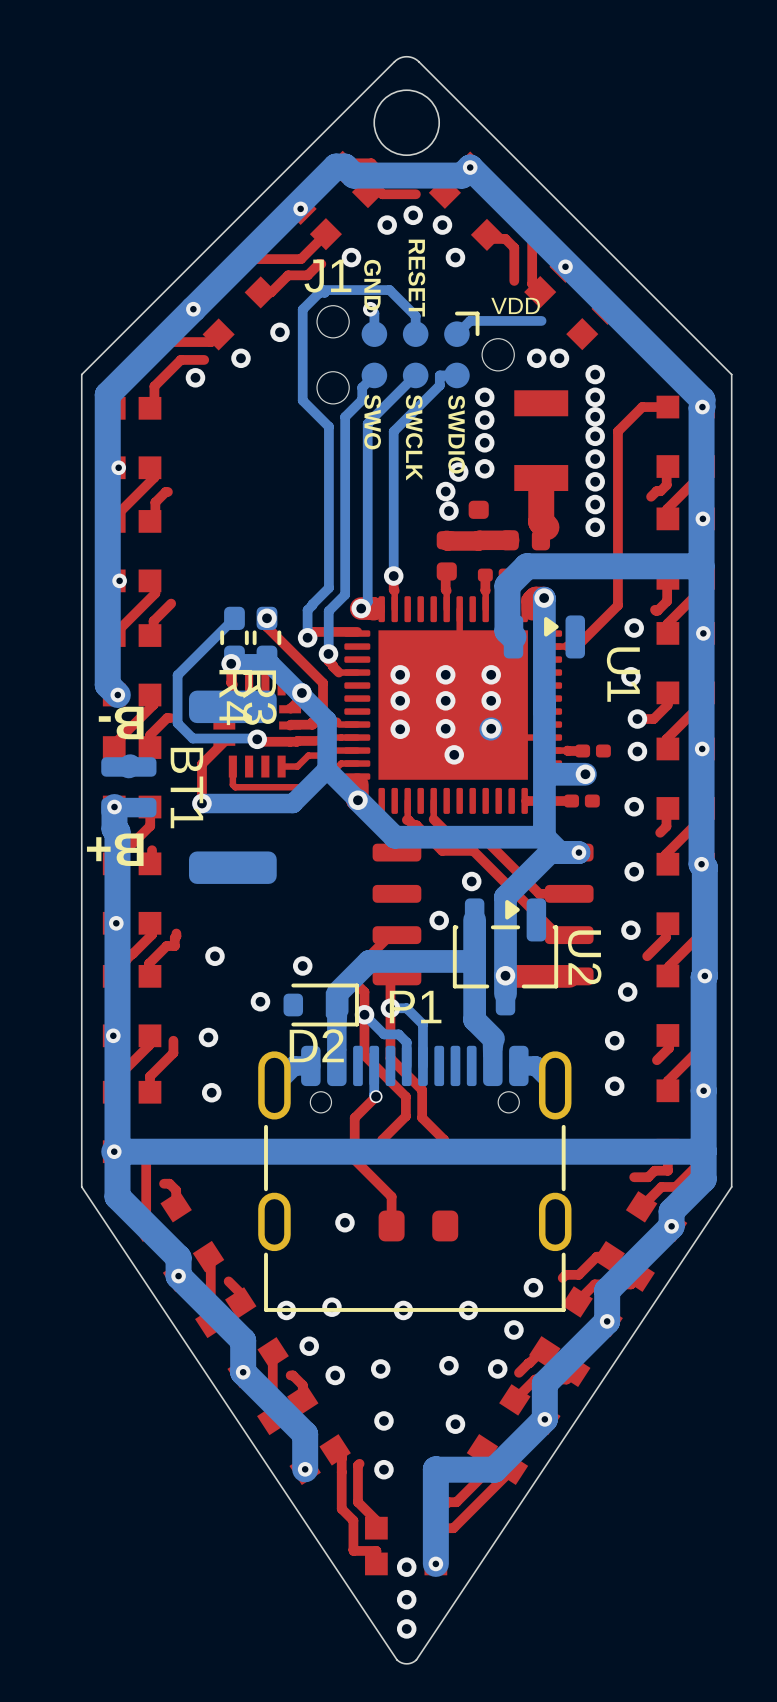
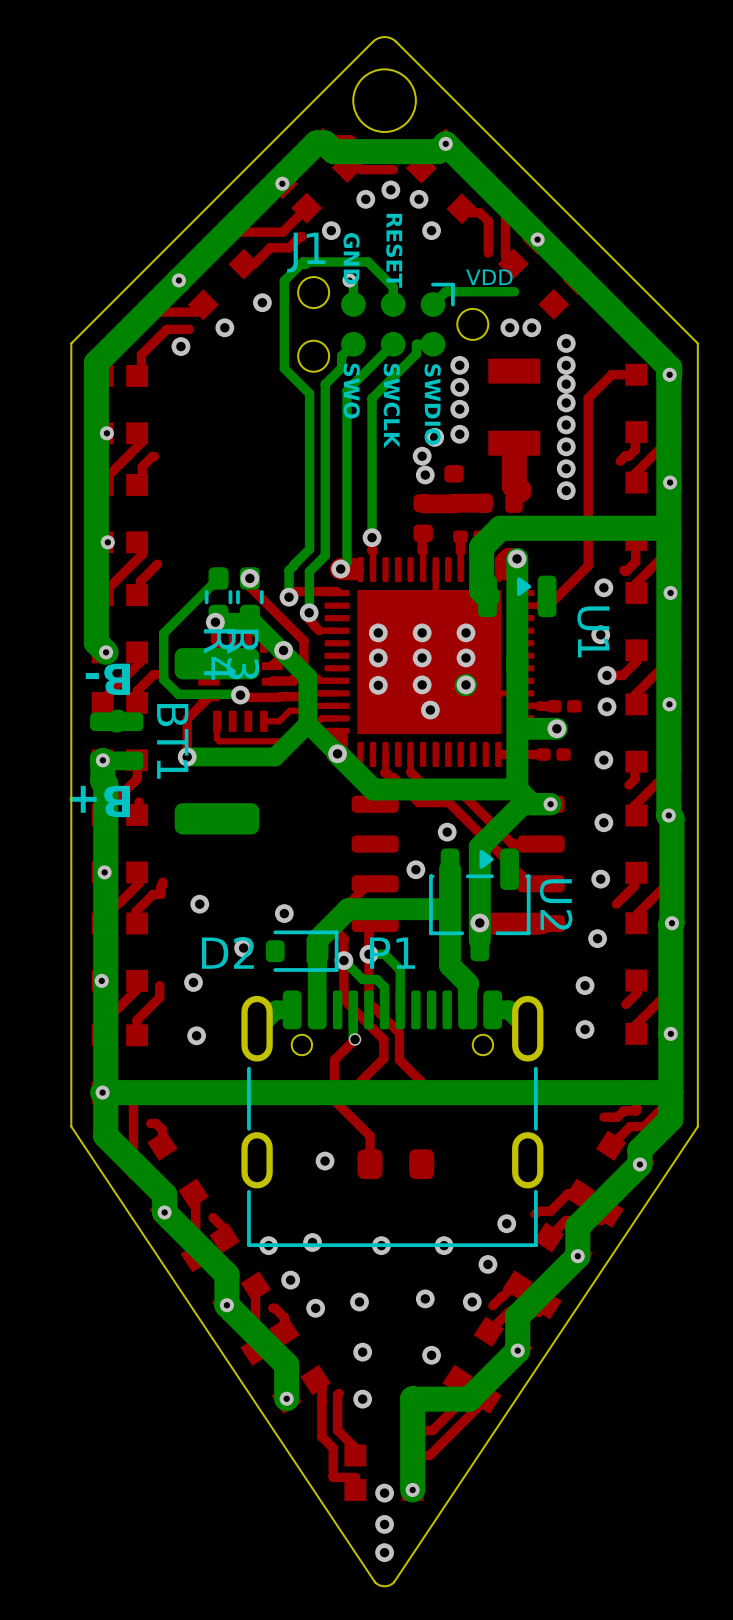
D2 name position: D2 (316, 1045) -> D2 (227, 952)

